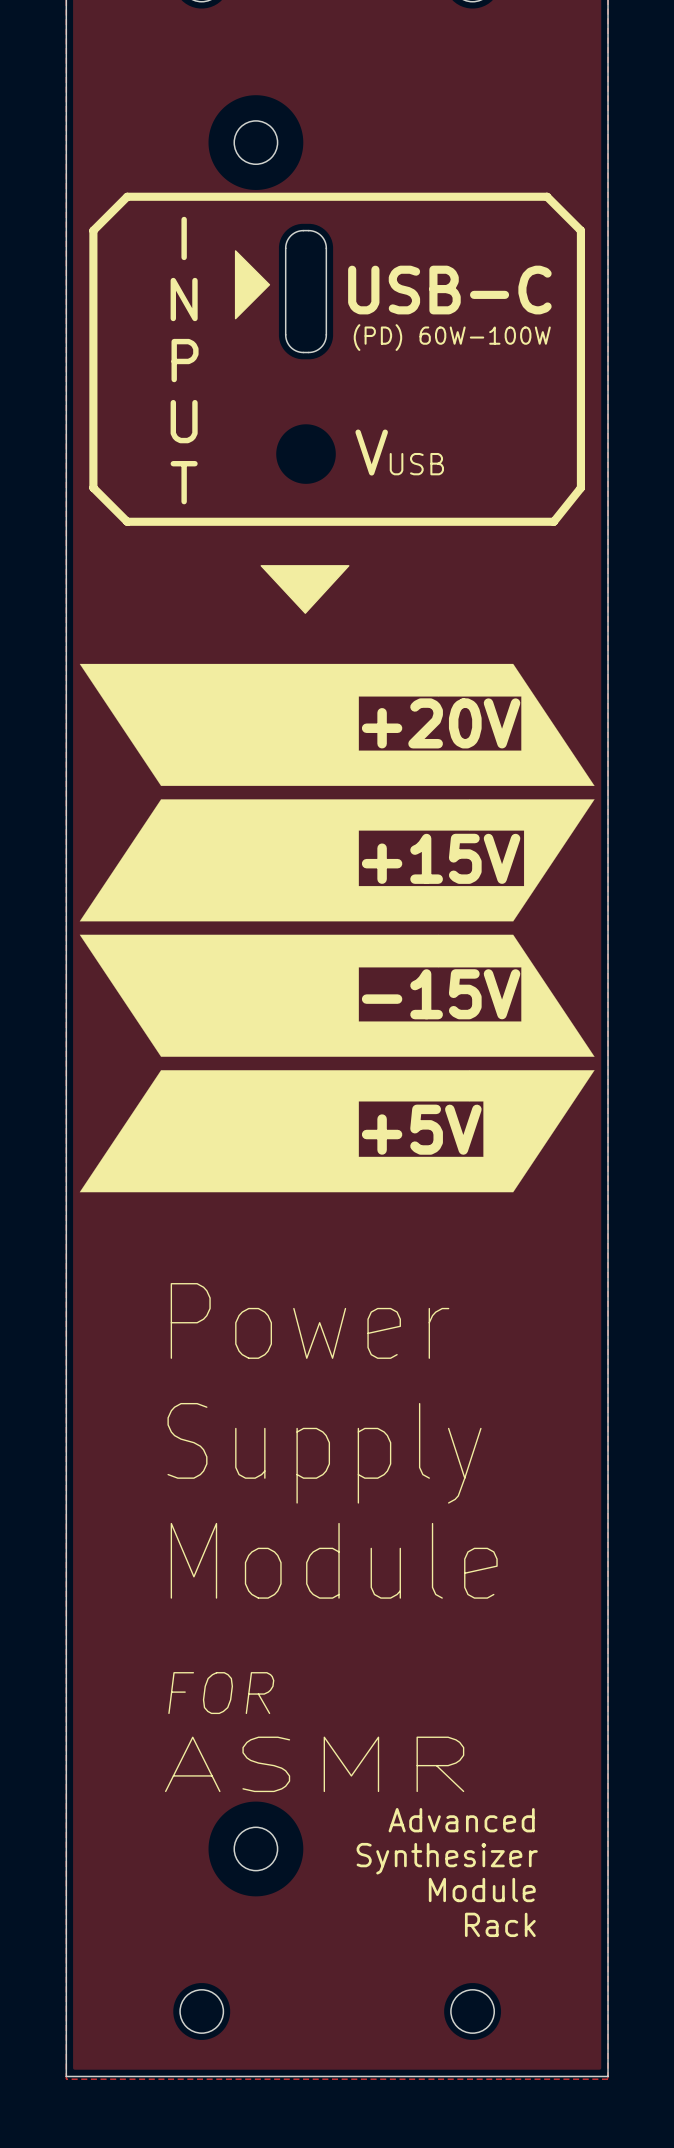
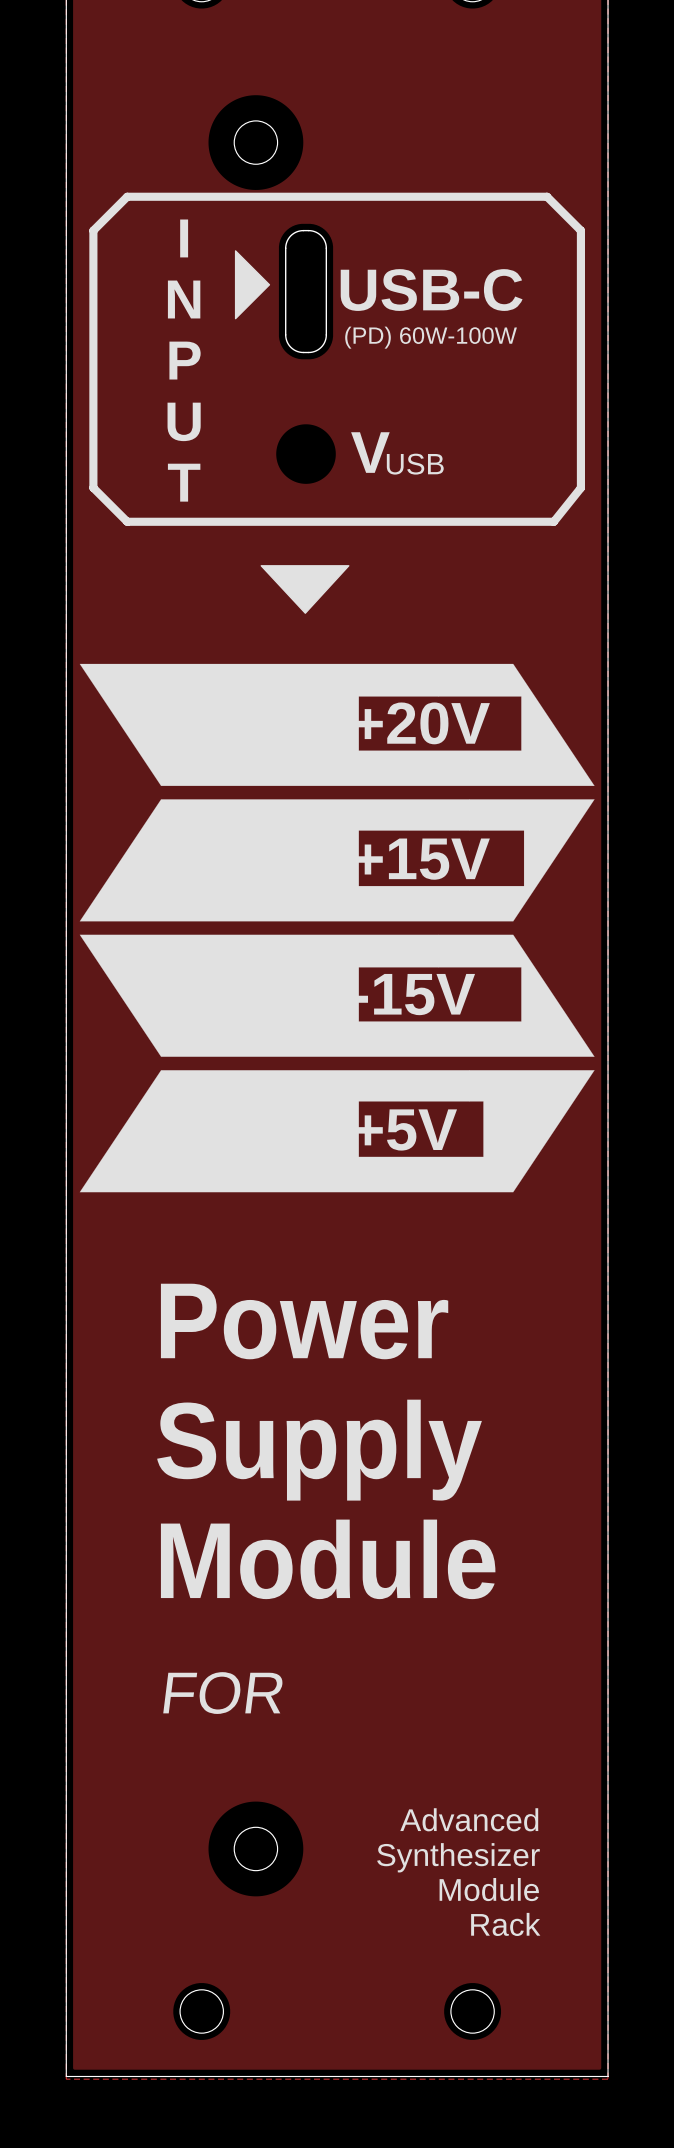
text: ASMR (314, 1764) -> none

